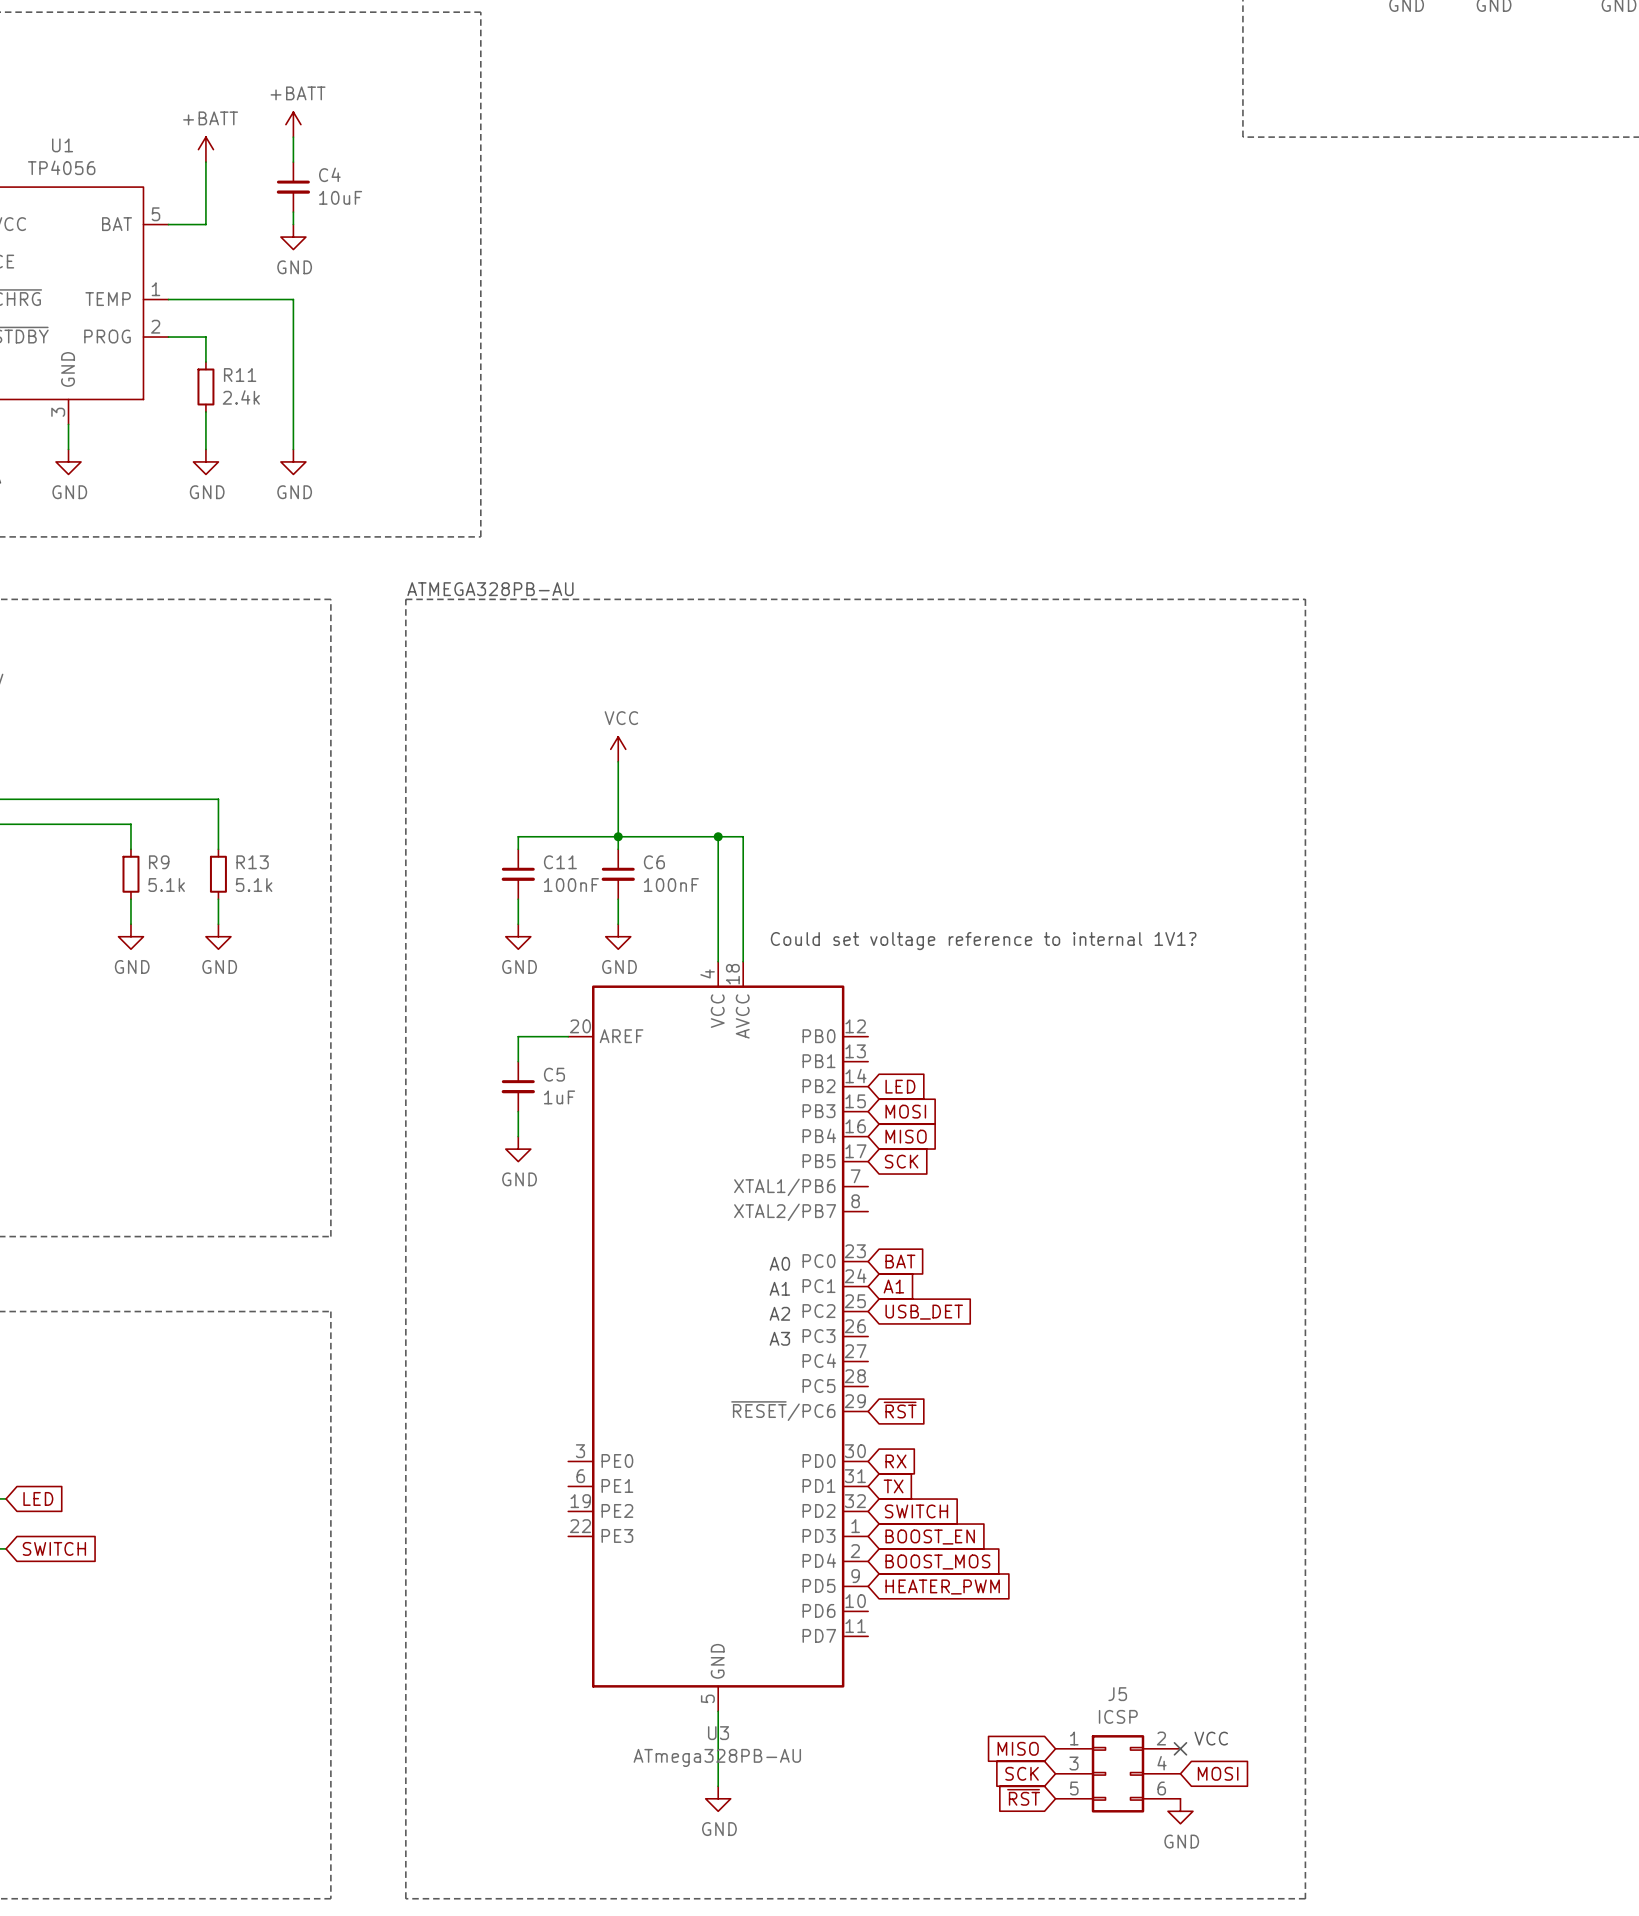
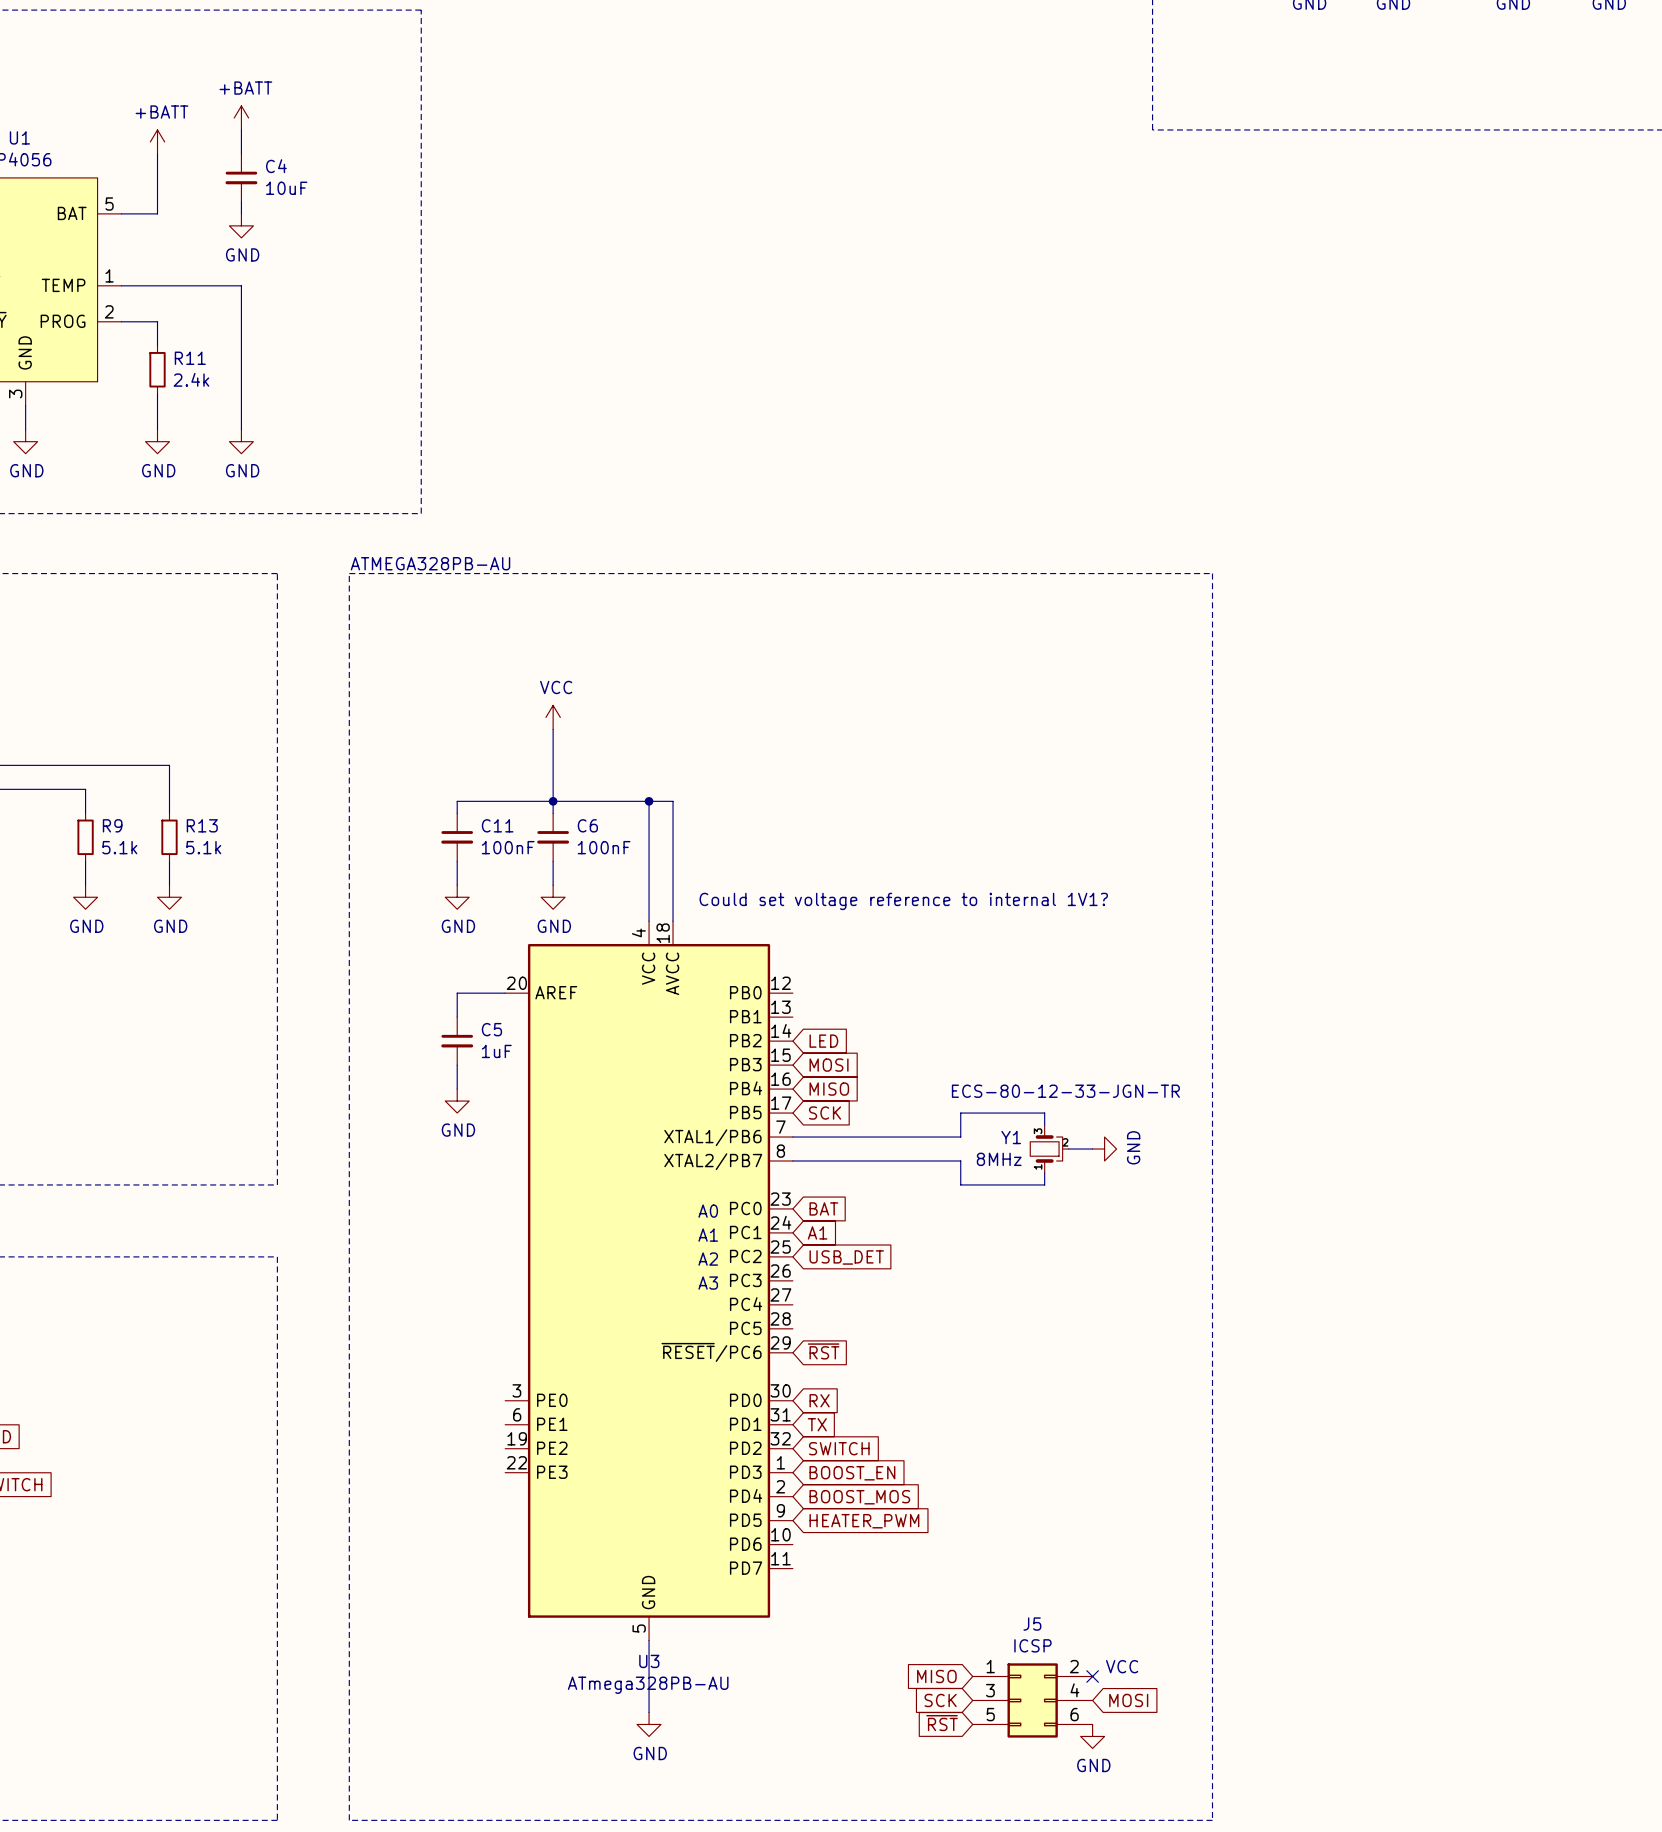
text: none -> ECS-80-12-33-JGN-TR (1065, 1091)
wire: none -> (1044, 1125) (1044, 1113) (960, 1113) (960, 1137) (792, 1137)
Y1: none -> 8MHz (1049, 1149)
wire: none -> (1068, 1149) (1092, 1149)
power symbol: none -> GND (1104, 1149)
wire: none -> (792, 1160) (960, 1160) (960, 1184) (1044, 1184) (1044, 1172)

